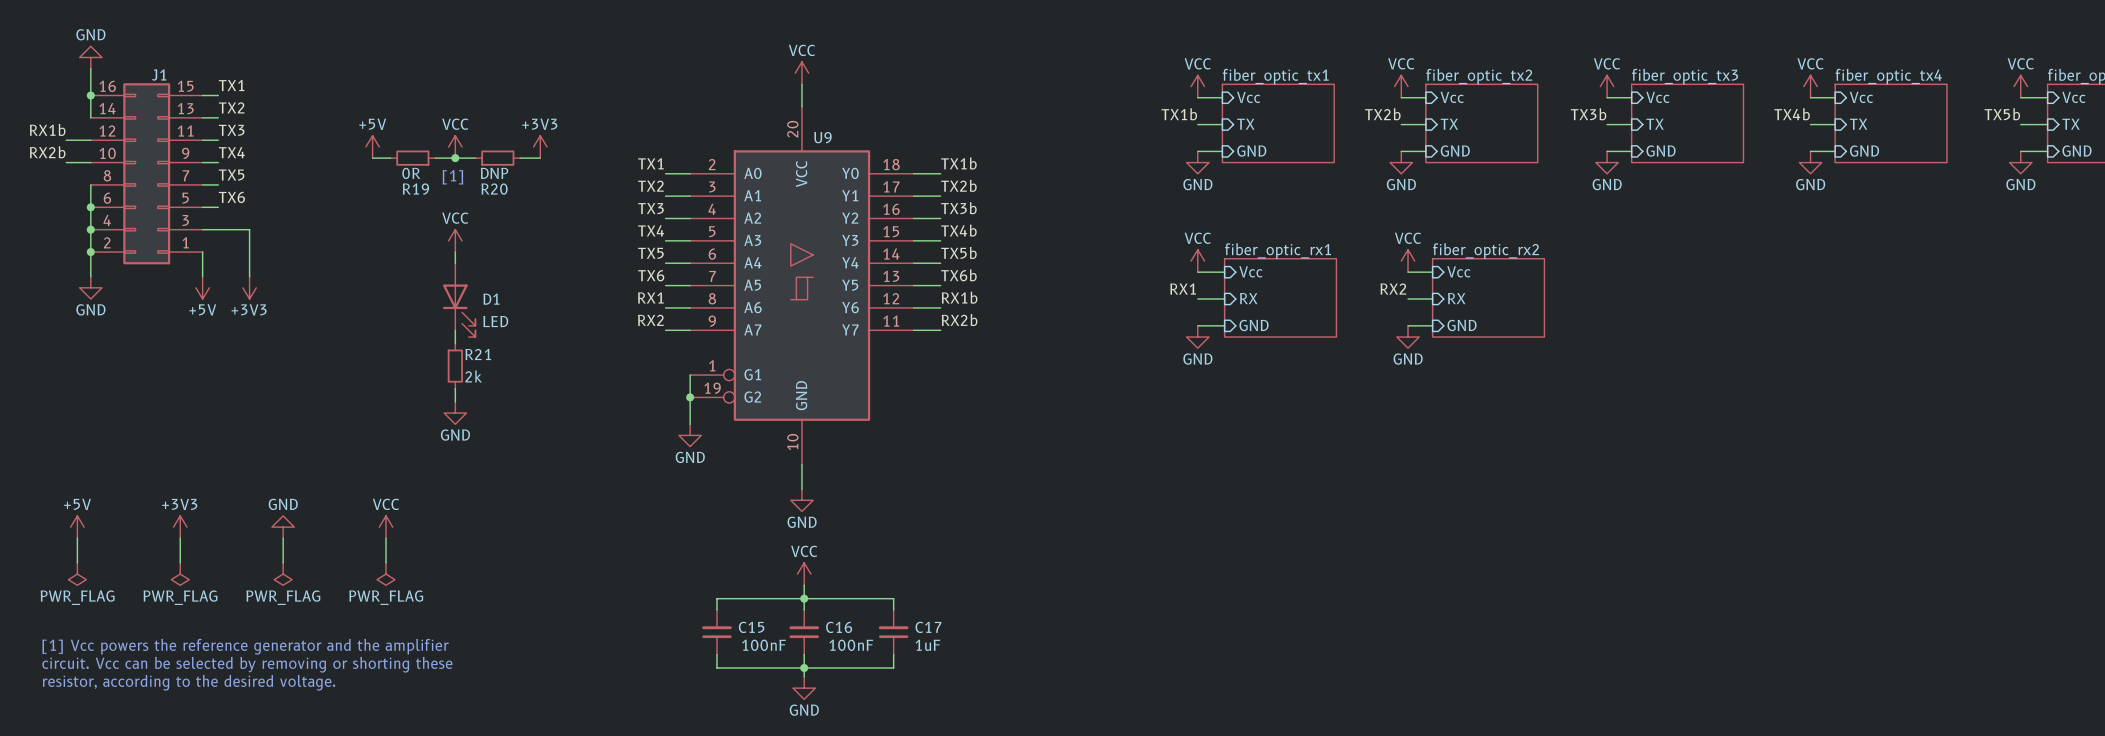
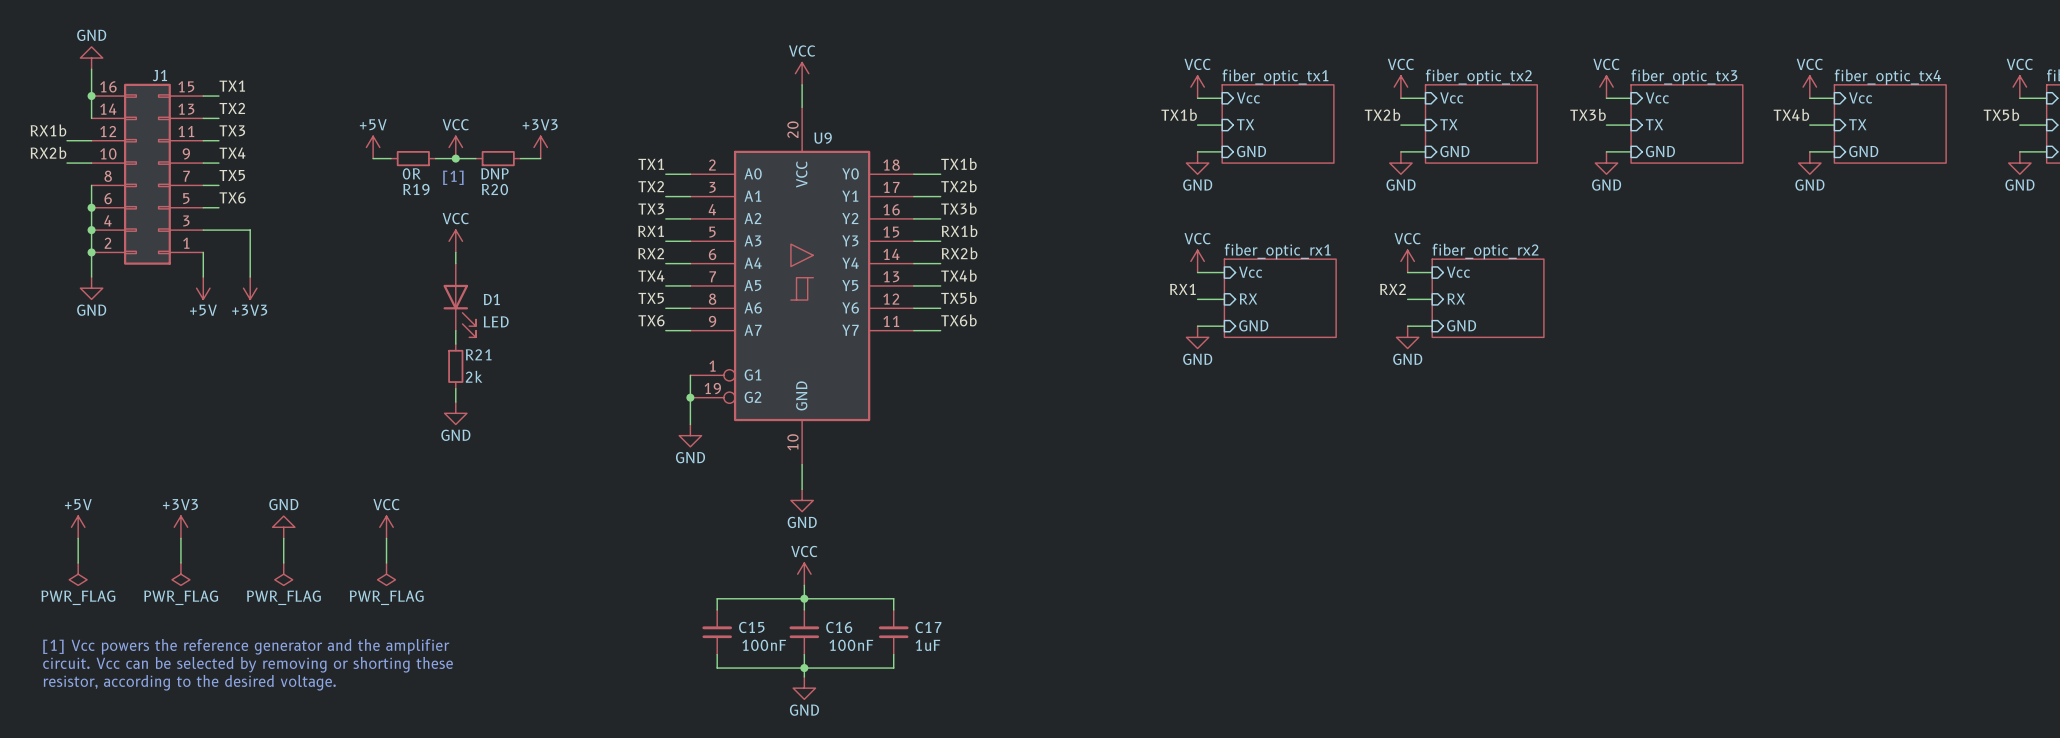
label: TX4 (651, 230) -> RX1 (651, 231)
label: TX4b (958, 230) -> RX1b (959, 230)
label: TX5b (958, 252) -> RX2b (959, 253)
label: TX5 (650, 253) -> RX2 (651, 253)
label: TX6 (651, 275) -> TX4 (651, 275)
label: TX6b (958, 275) -> TX4b (958, 275)
label: RX1 (650, 297) -> TX5 (651, 298)
label: RX1b (959, 297) -> TX5b (958, 298)
label: RX2 (650, 320) -> TX6 (651, 320)
label: RX2b (959, 320) -> TX6b (958, 320)

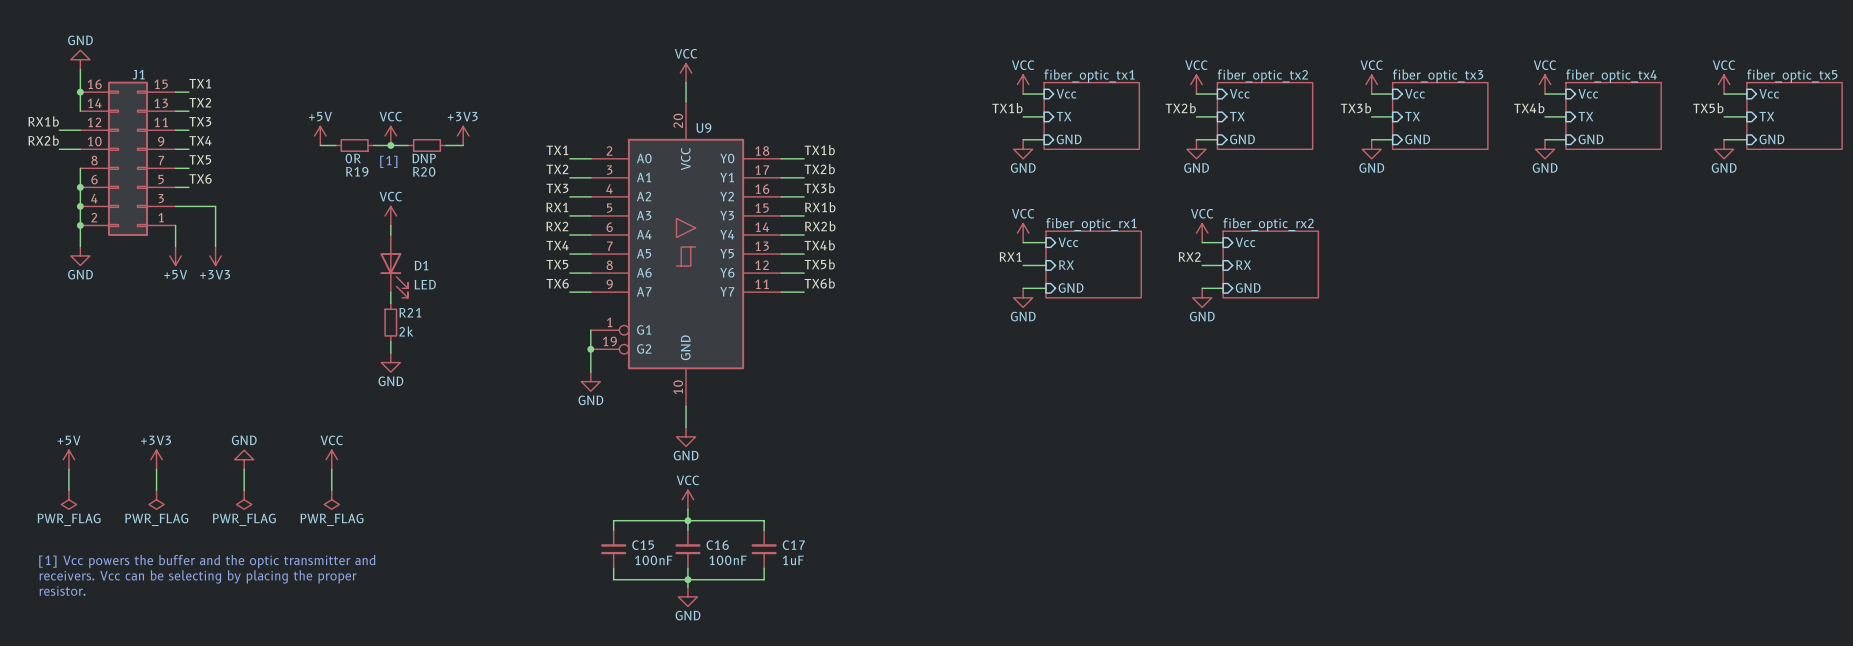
text: [1] Vcc powers the reference generator and the amplifier (246, 646) -> [1] Vcc powers the buffer and the optic transmitter and (207, 561)
text: circuit. Vcc can be selected by removing or shorting these (247, 664) -> receivers. Vcc can be selecting by placing the proper (198, 576)
text: resistor, according to the desired voltage. (189, 682) -> resistor. (62, 591)

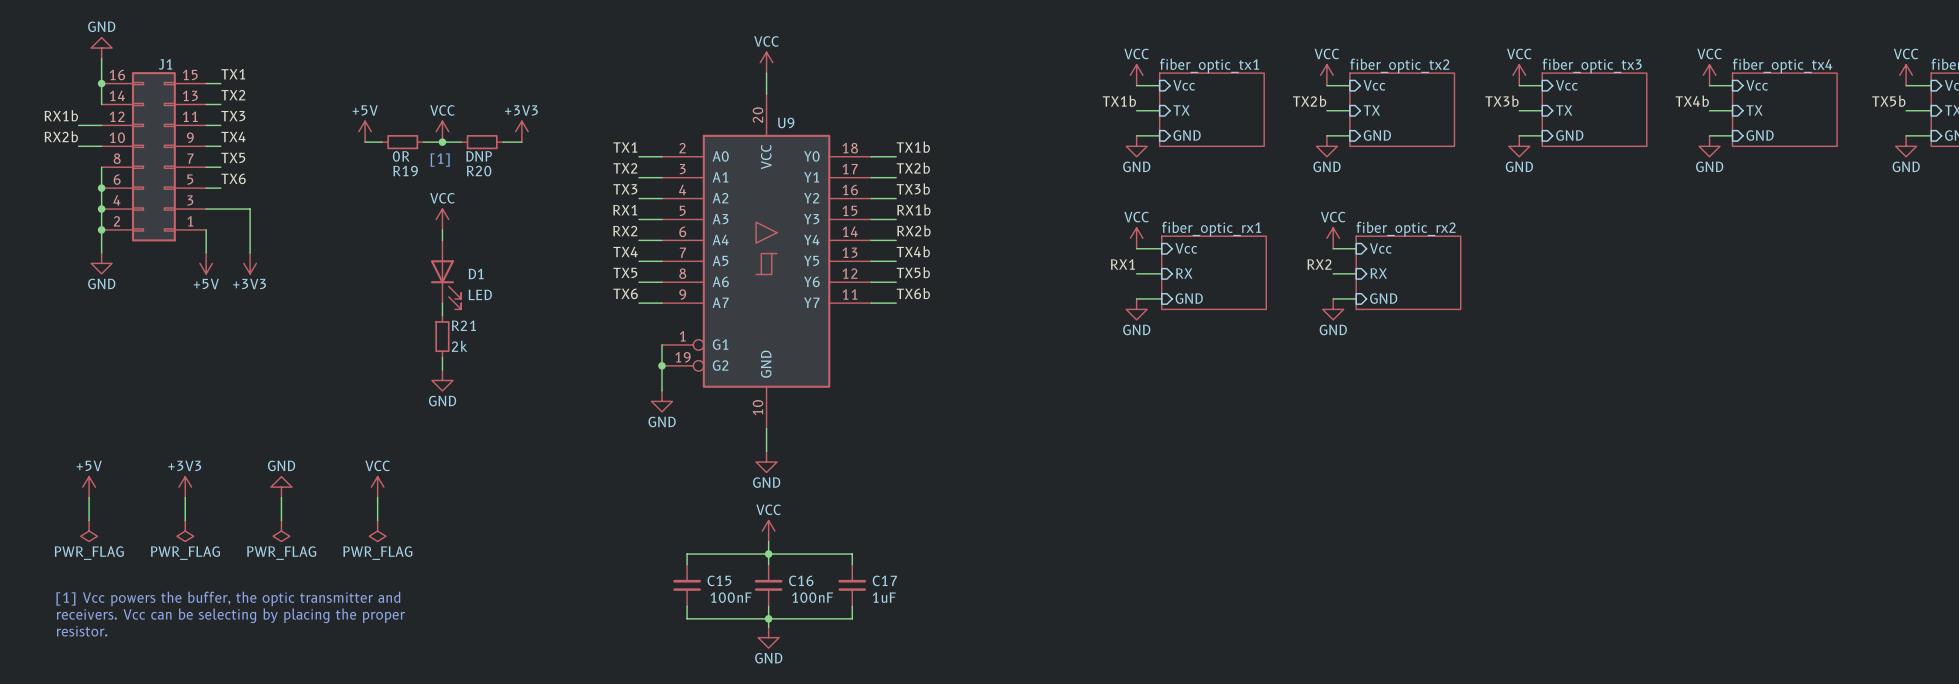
text: [1] Vcc powers the buffer and the optic transmitter and (207, 561) -> [1] Vcc powers the buffer, the optic transmitter and (228, 598)

